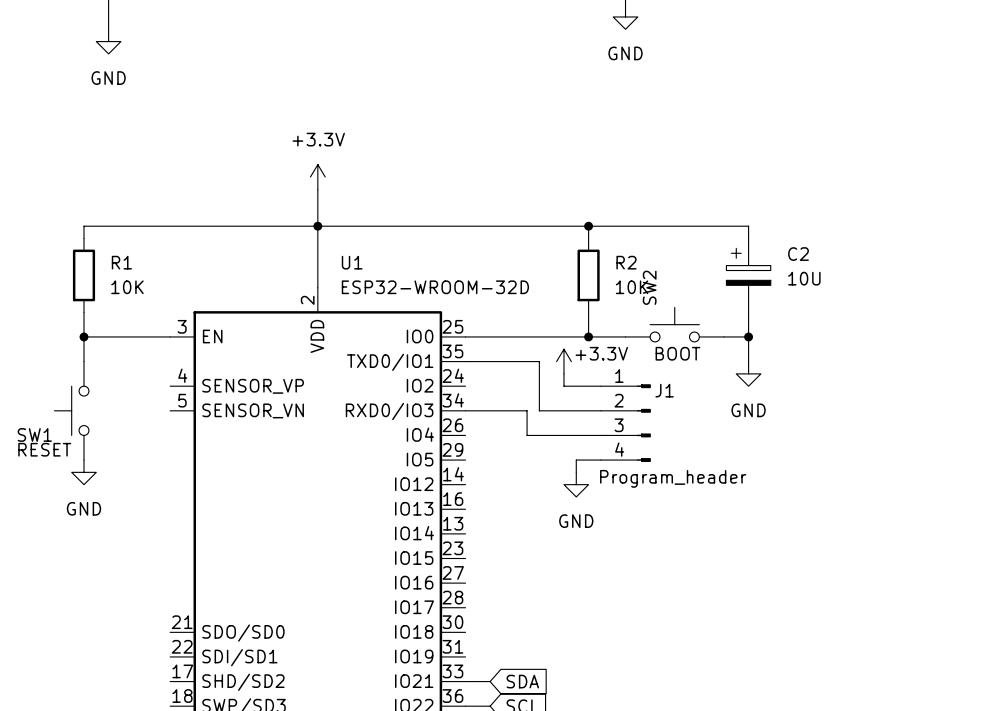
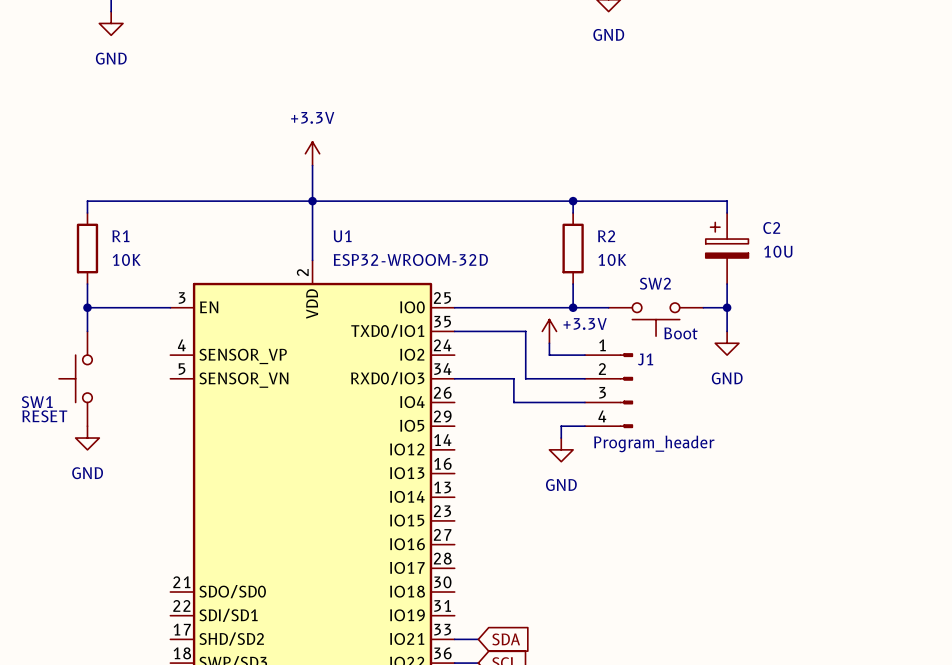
SW2 name position: SW2 (649, 287) -> SW2 (655, 283)
SW2 rotation: 0° (674, 324) -> 180° (656, 319)
SW2 value: BOOT (677, 353) -> Boot (681, 333)

